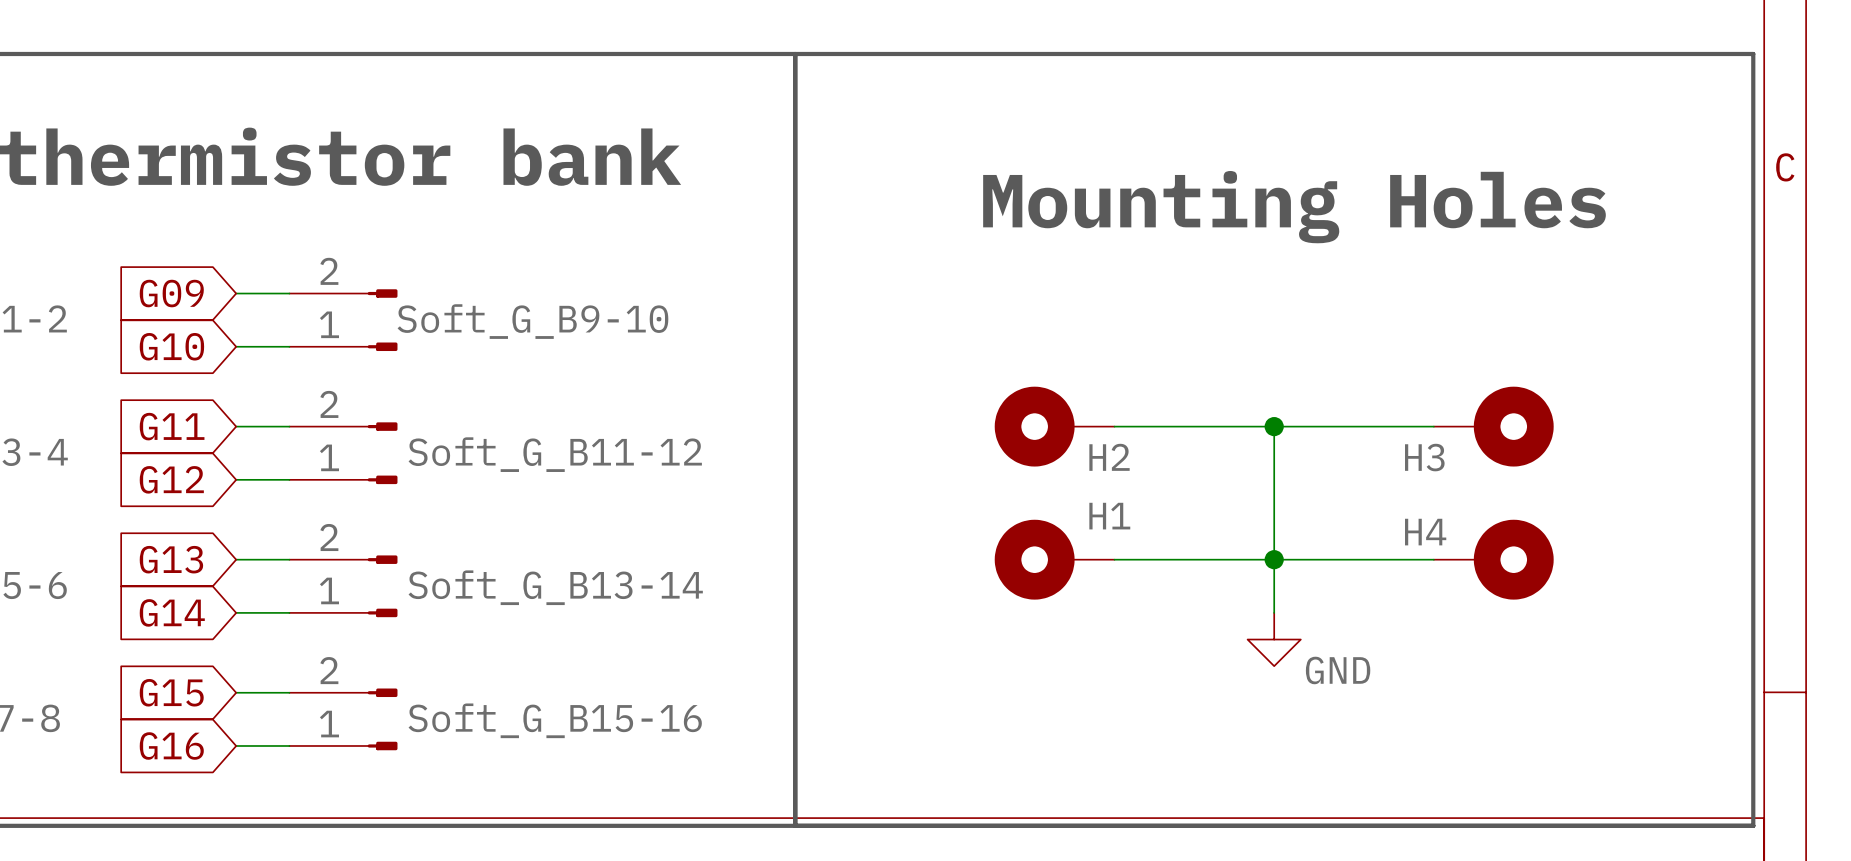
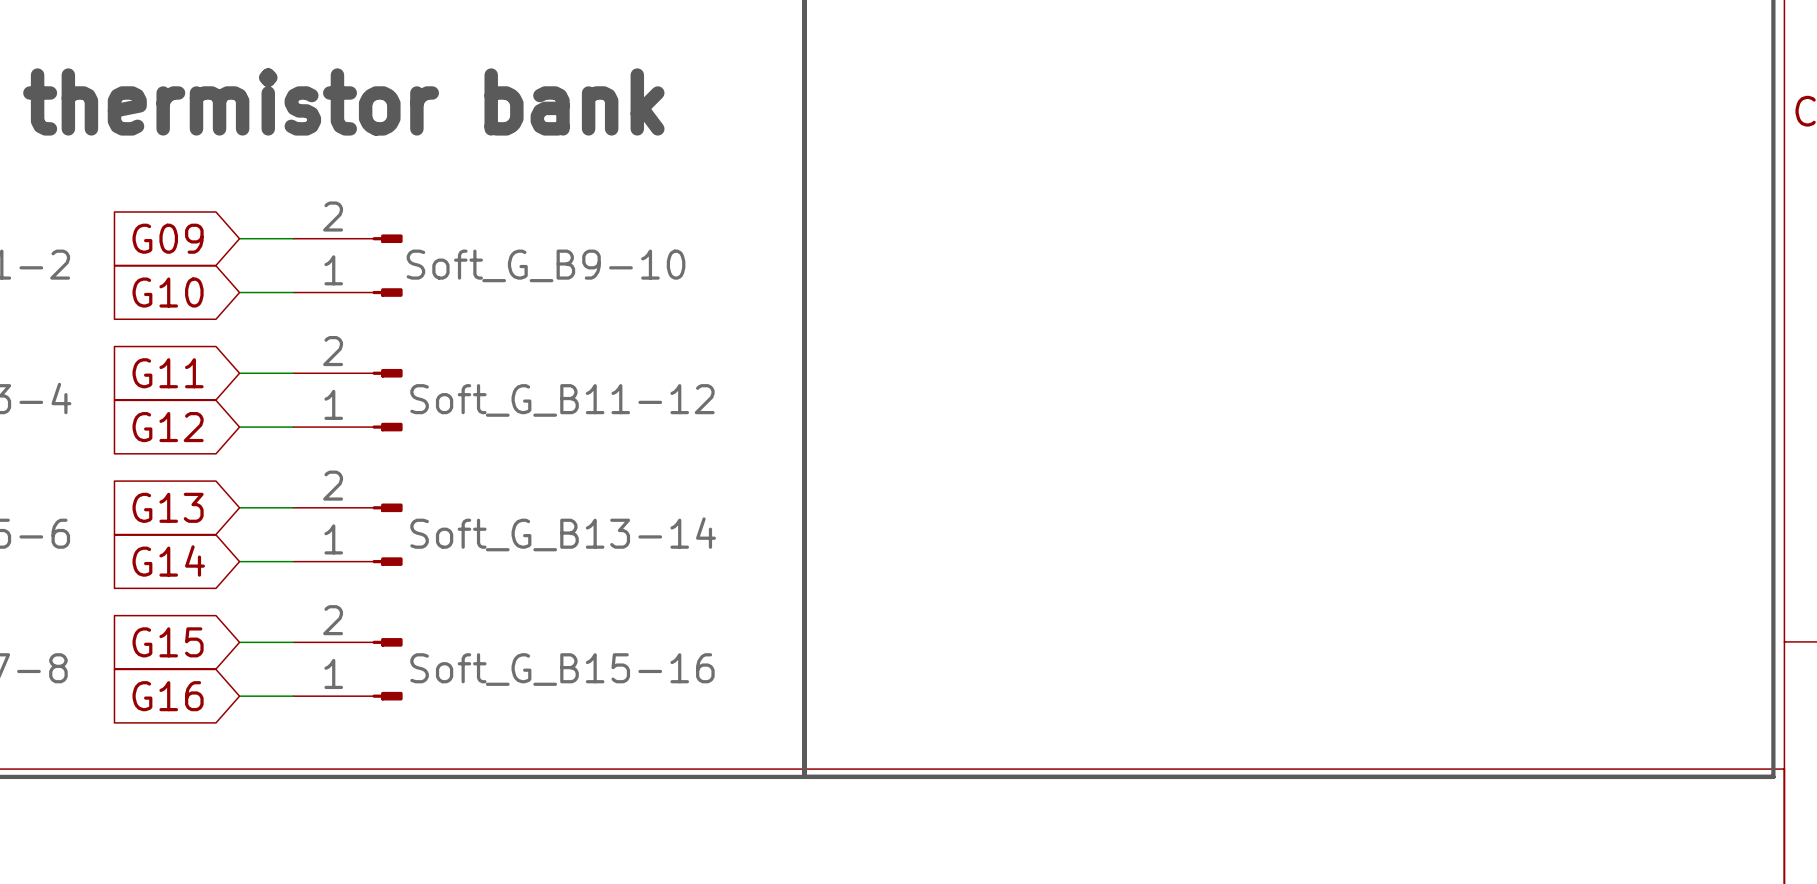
text: Mounting Holes (1294, 207) -> none
H2: (1054, 426) -> none
wire: (1114, 426) (1433, 426) -> none
wire: (1274, 426) (1274, 612) -> none
junction: (1274, 426) -> none
H3: (1493, 426) -> none
H1: (1054, 559) -> none
wire: (1114, 559) (1433, 559) -> none
junction: (1274, 559) -> none
H4: (1493, 559) -> none
power symbol: GND (1274, 639) -> none

